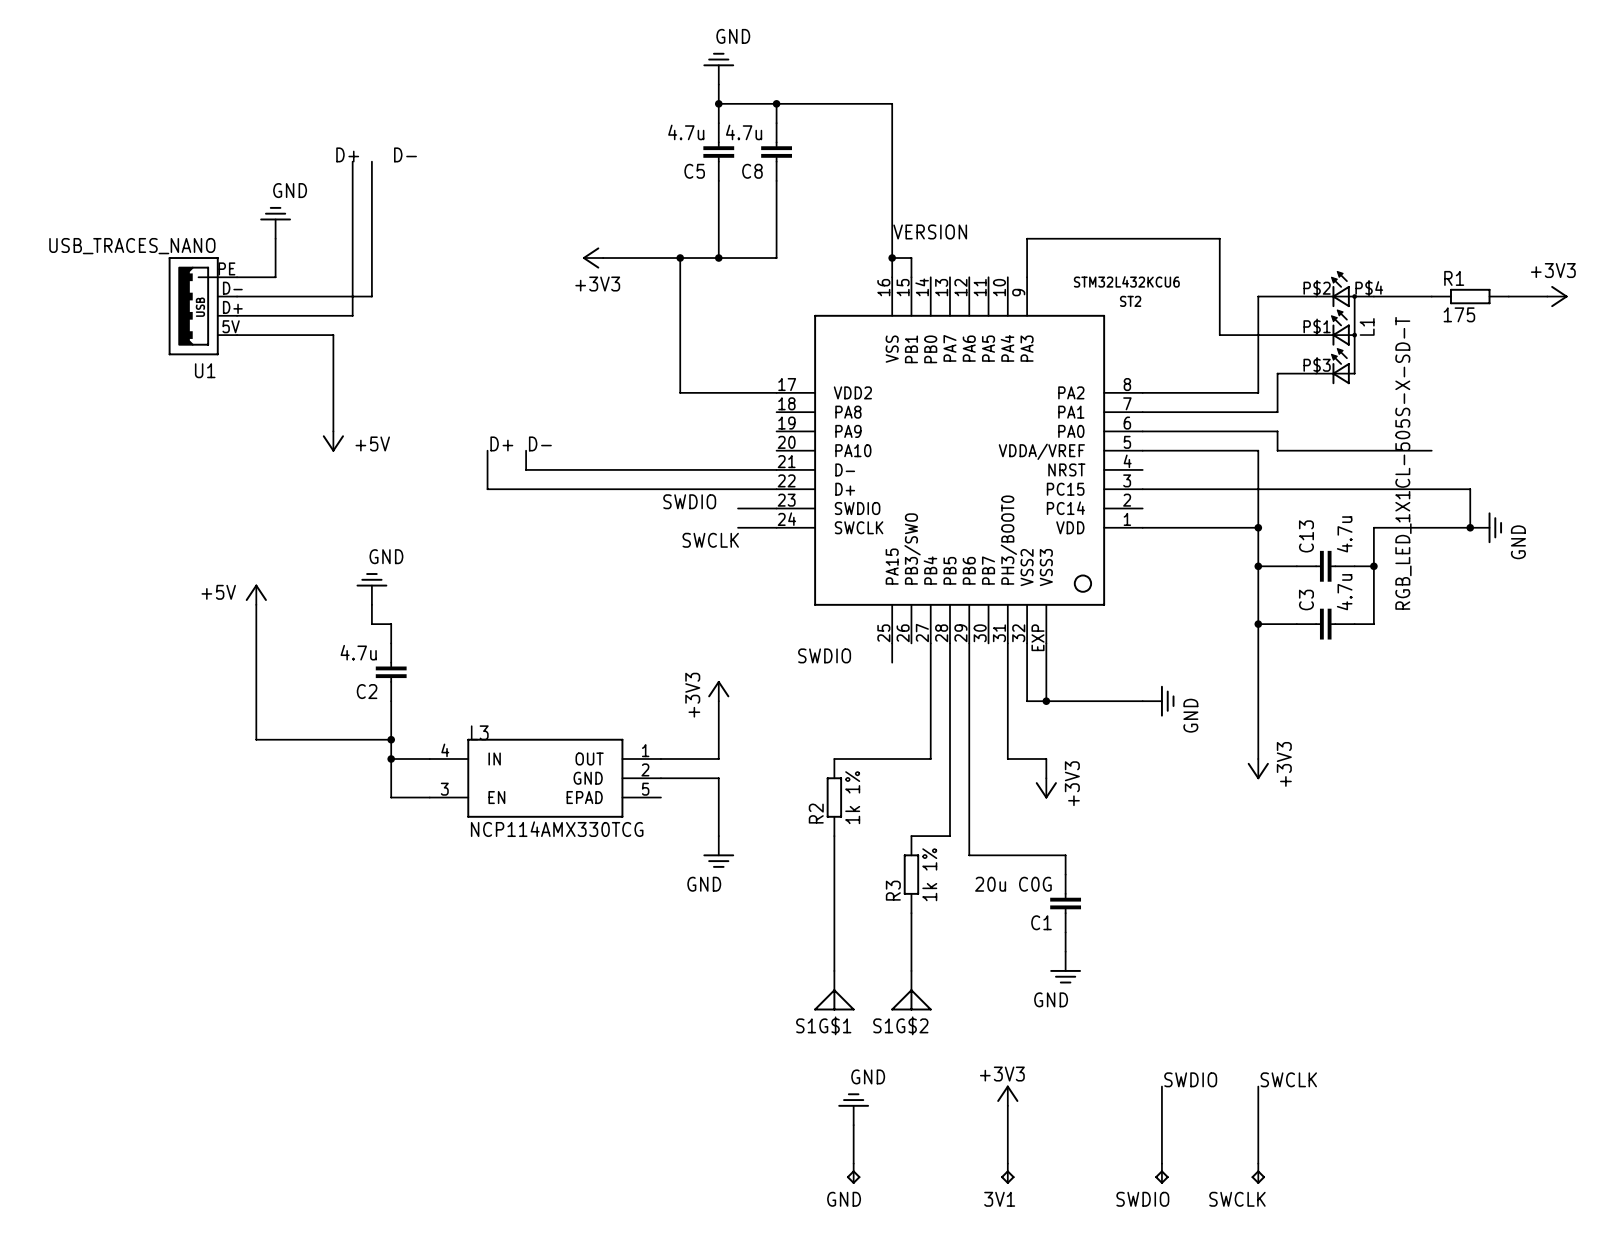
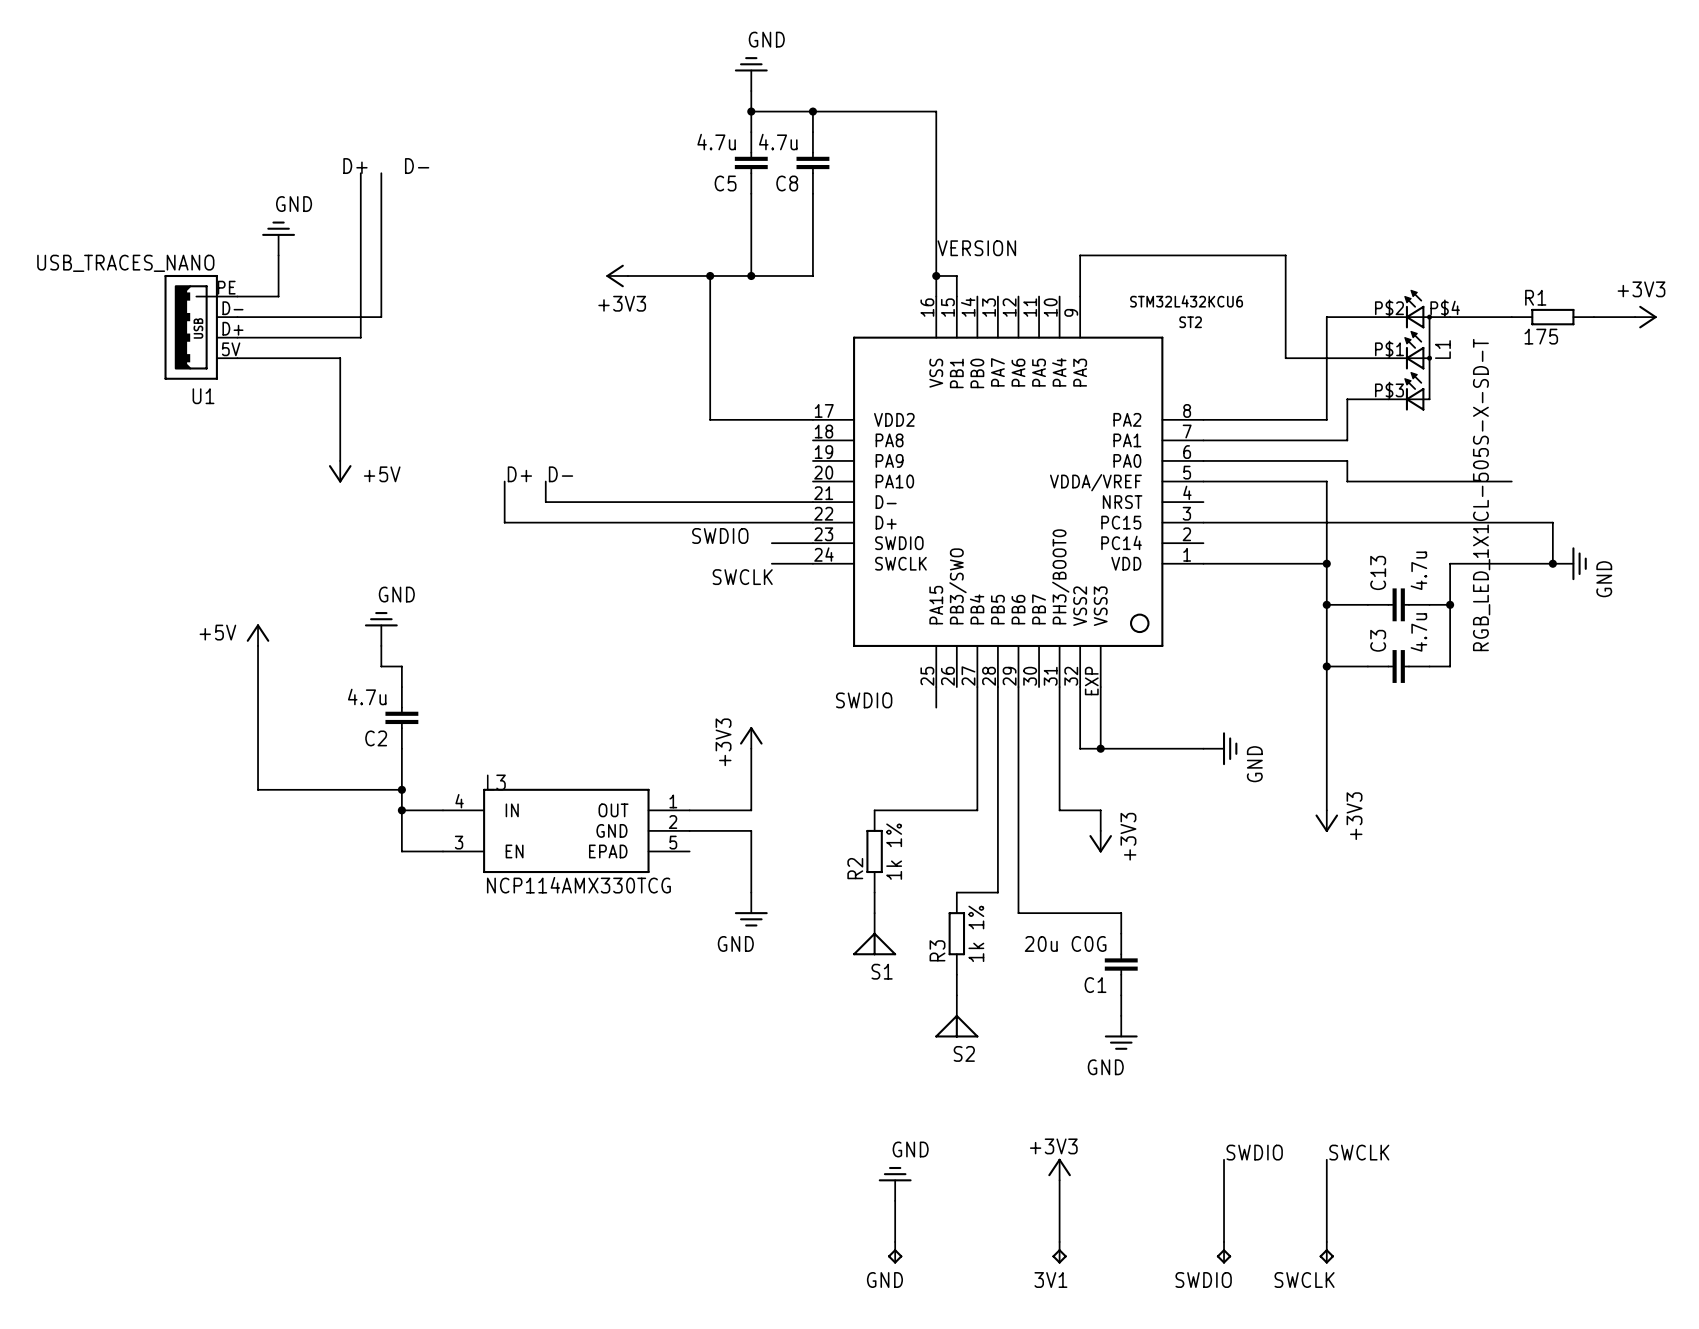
wire: (834, 855) (834, 970) -> none
S1: none -> (874, 934)
S2: none -> (956, 1016)
S1G$1: (834, 990) -> none
S1G$2: (911, 990) -> none

